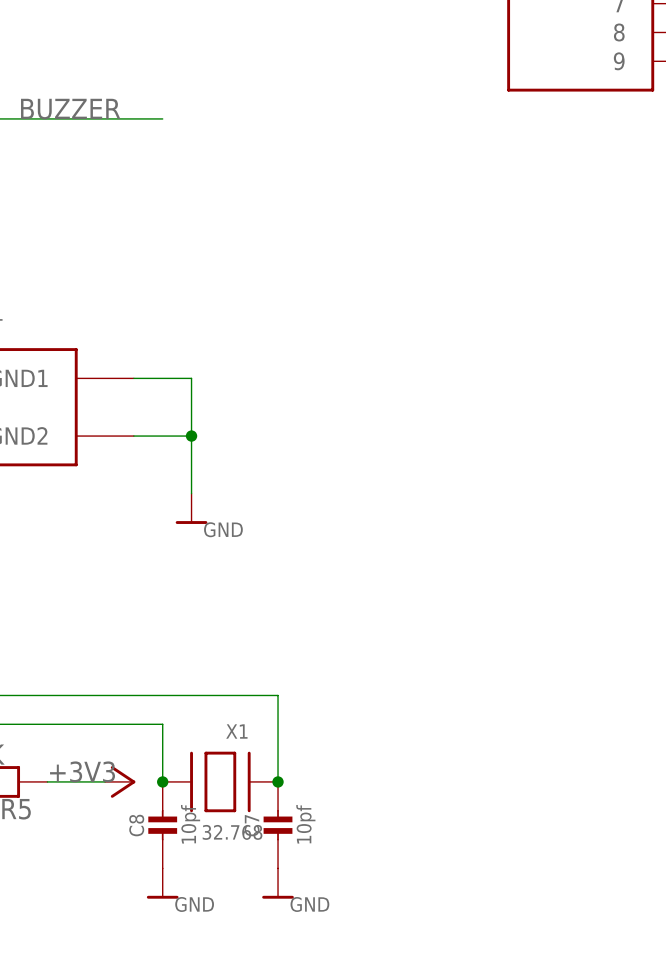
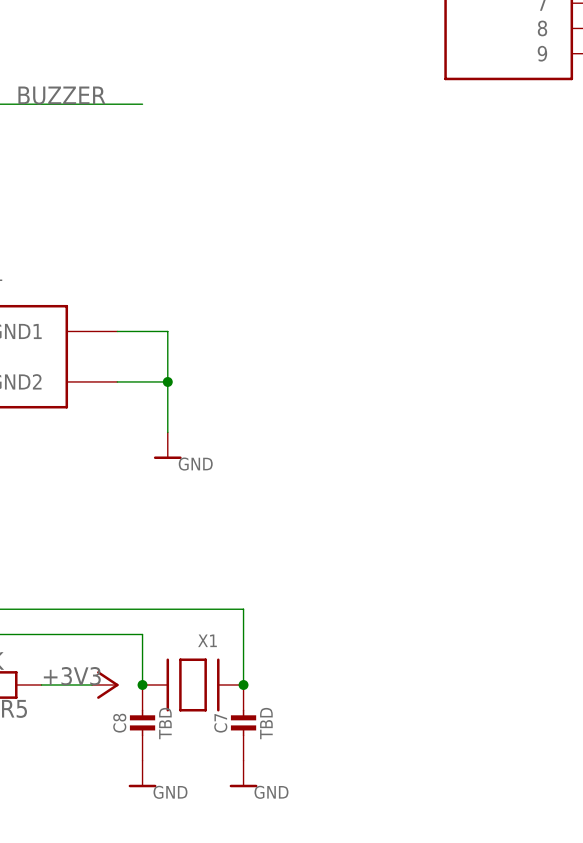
C8 value: 10pf (190, 824) -> TBD (165, 723)
C7 value: 10pf (305, 824) -> TBD (266, 723)
X1 value: 32.768 (232, 832) -> none

